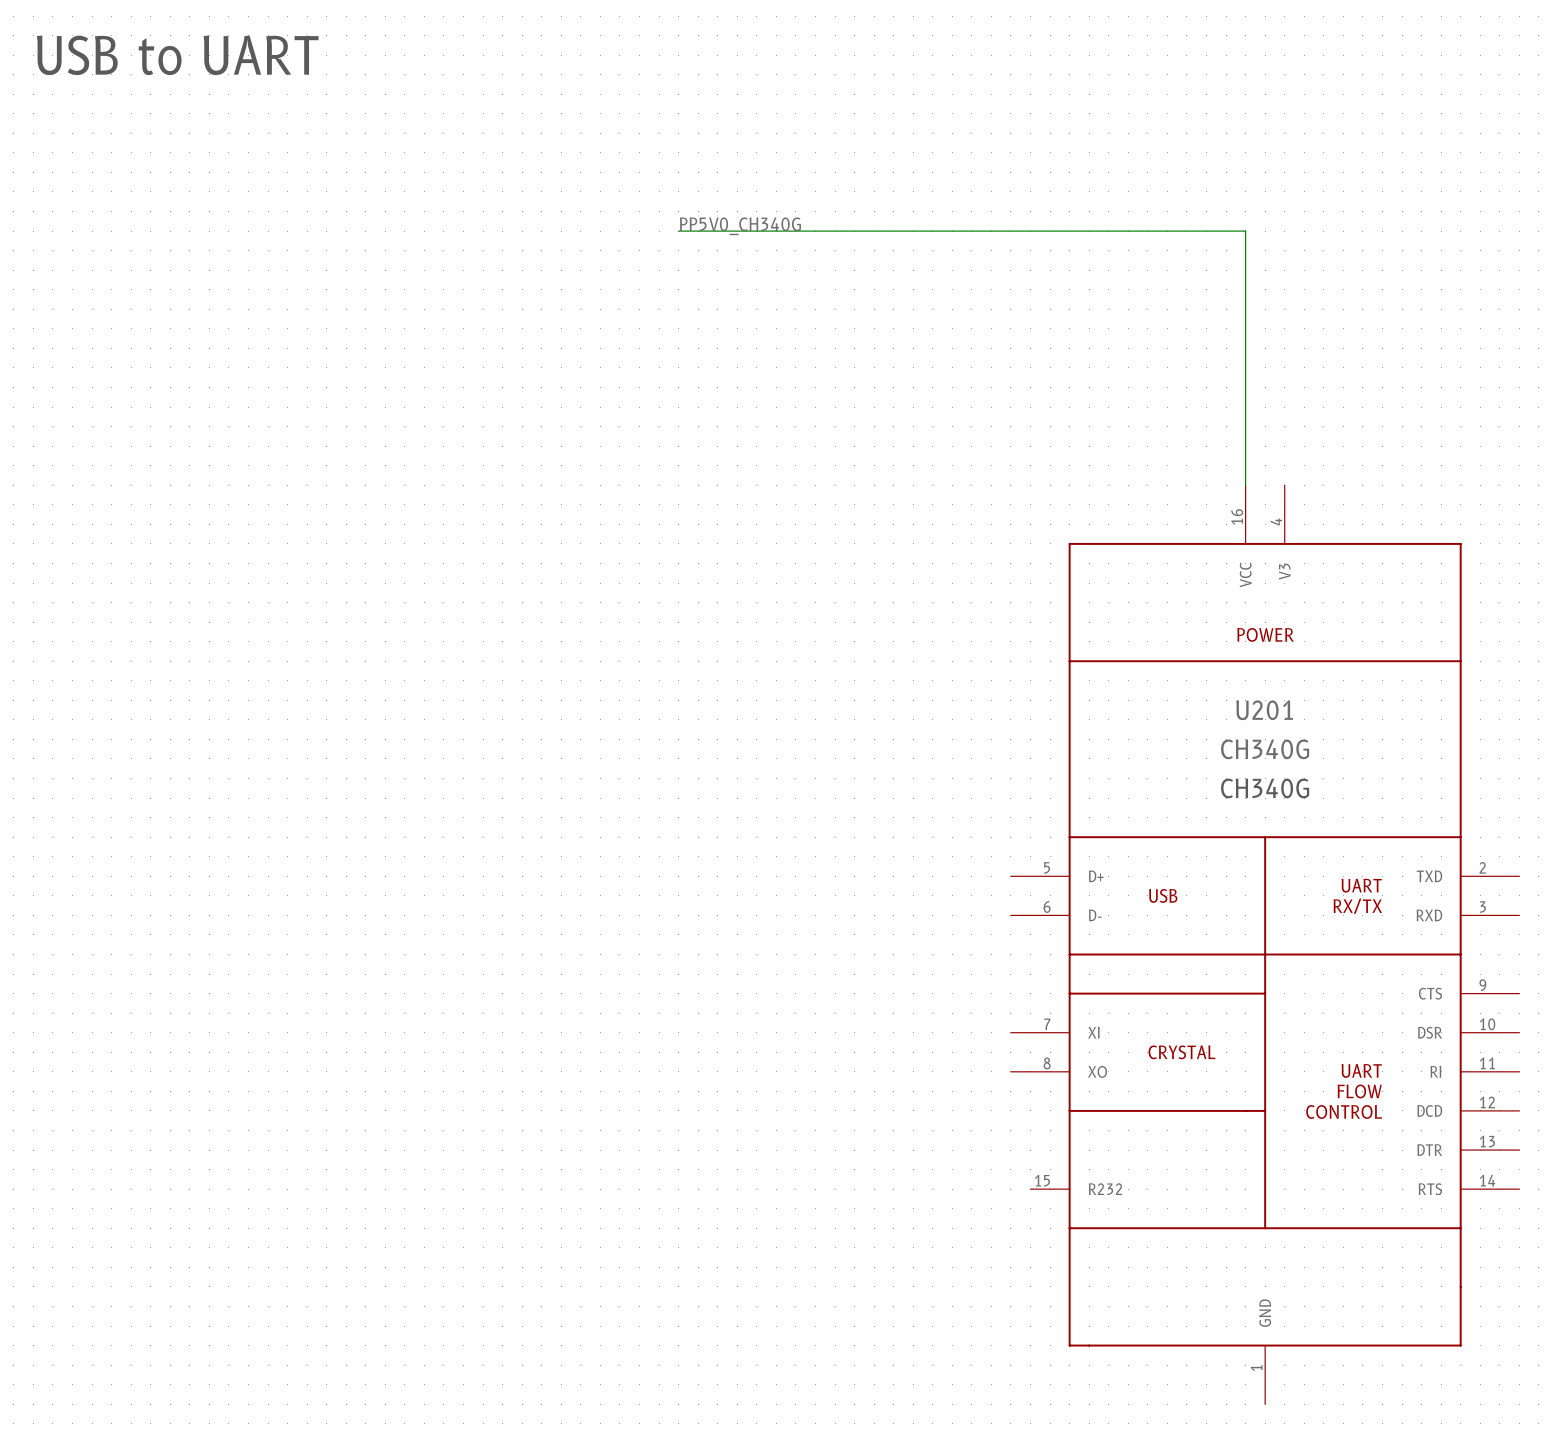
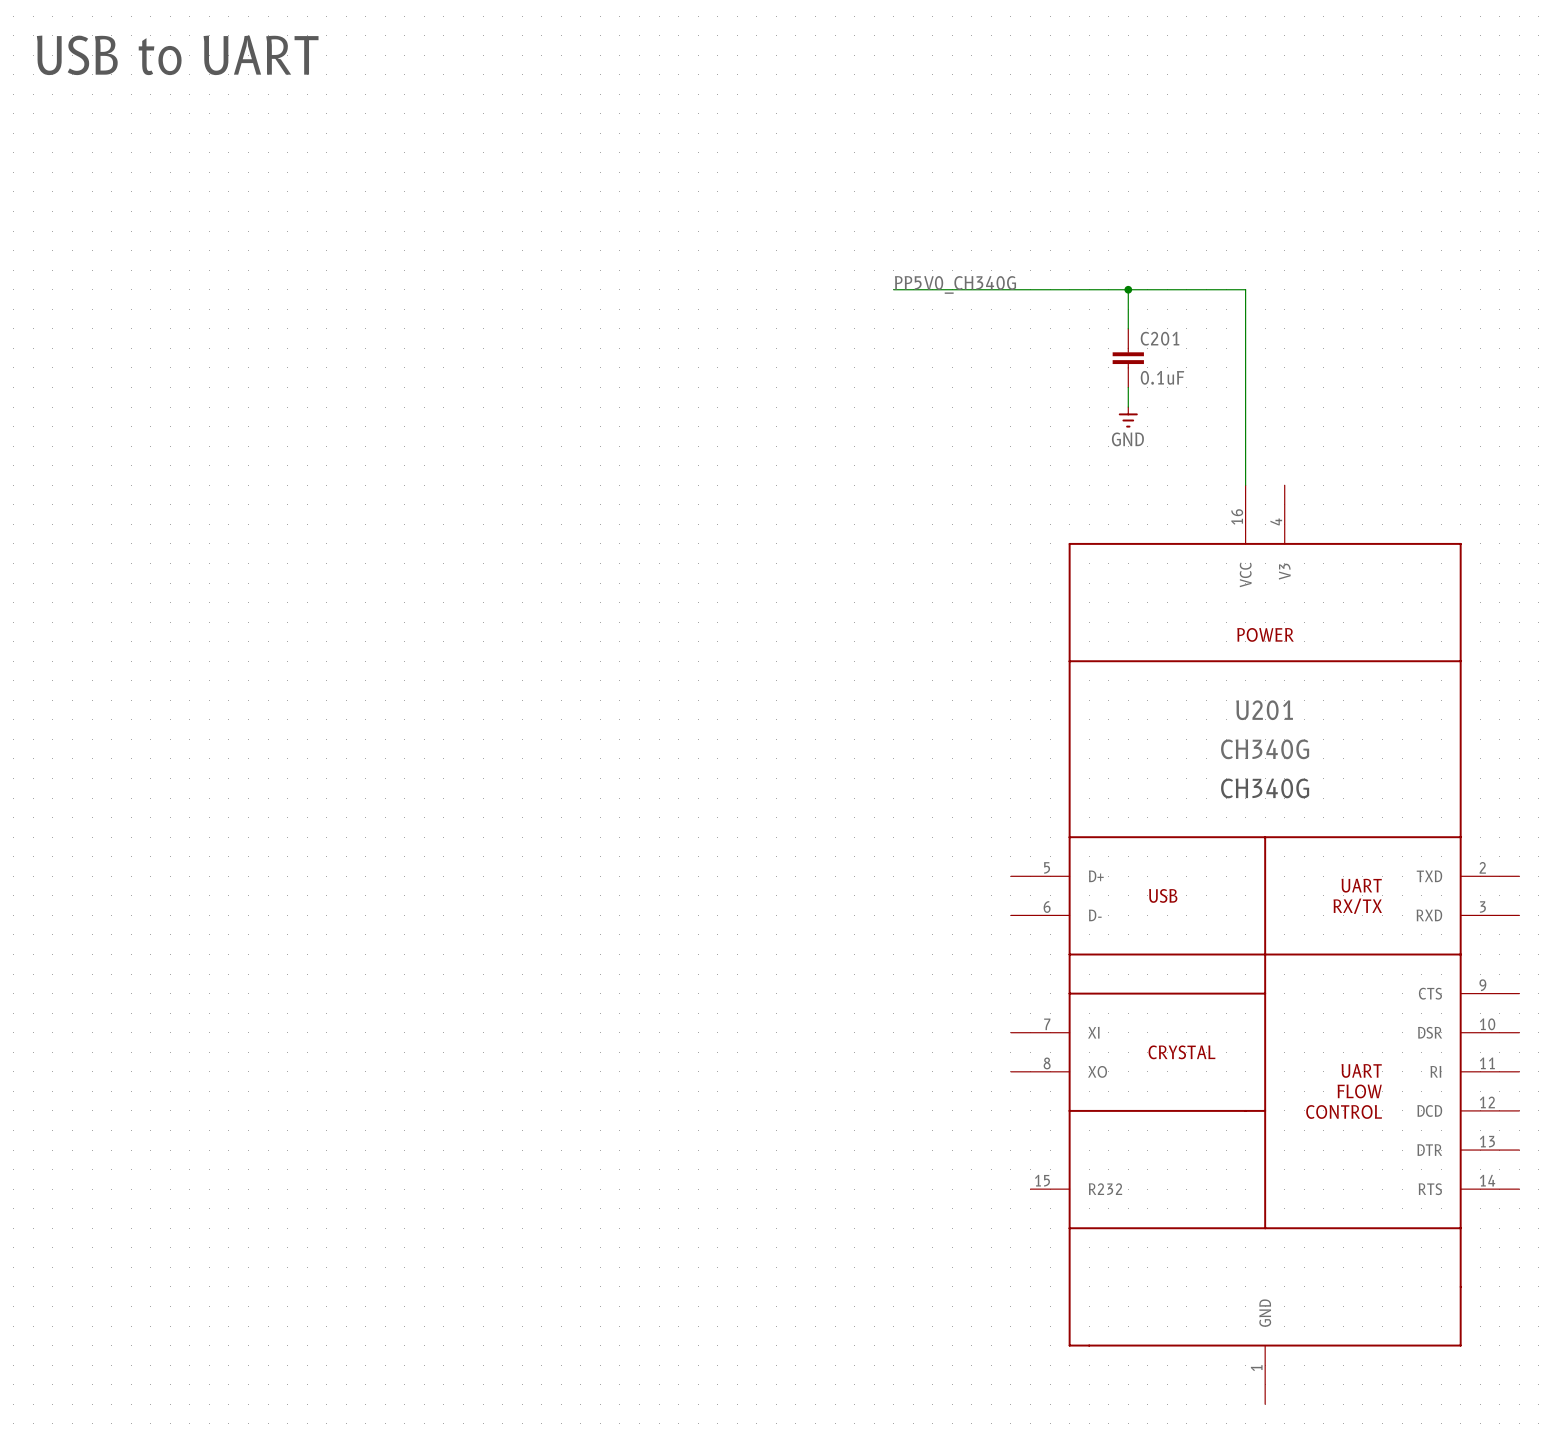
label: PP5V0_CH340G (740, 226) -> none
wire: (678, 231) (1245, 231) (1245, 289) -> (893, 289) (1245, 289)
label: none -> PP5V0_CH340G (955, 284)
wire: none -> (1128, 289) (1128, 328)
junction: none -> (1128, 289)
C201: none -> 0.1uF (1128, 358)
wire: none -> (1128, 387) (1128, 407)
power symbol: none -> GND (1128, 417)

